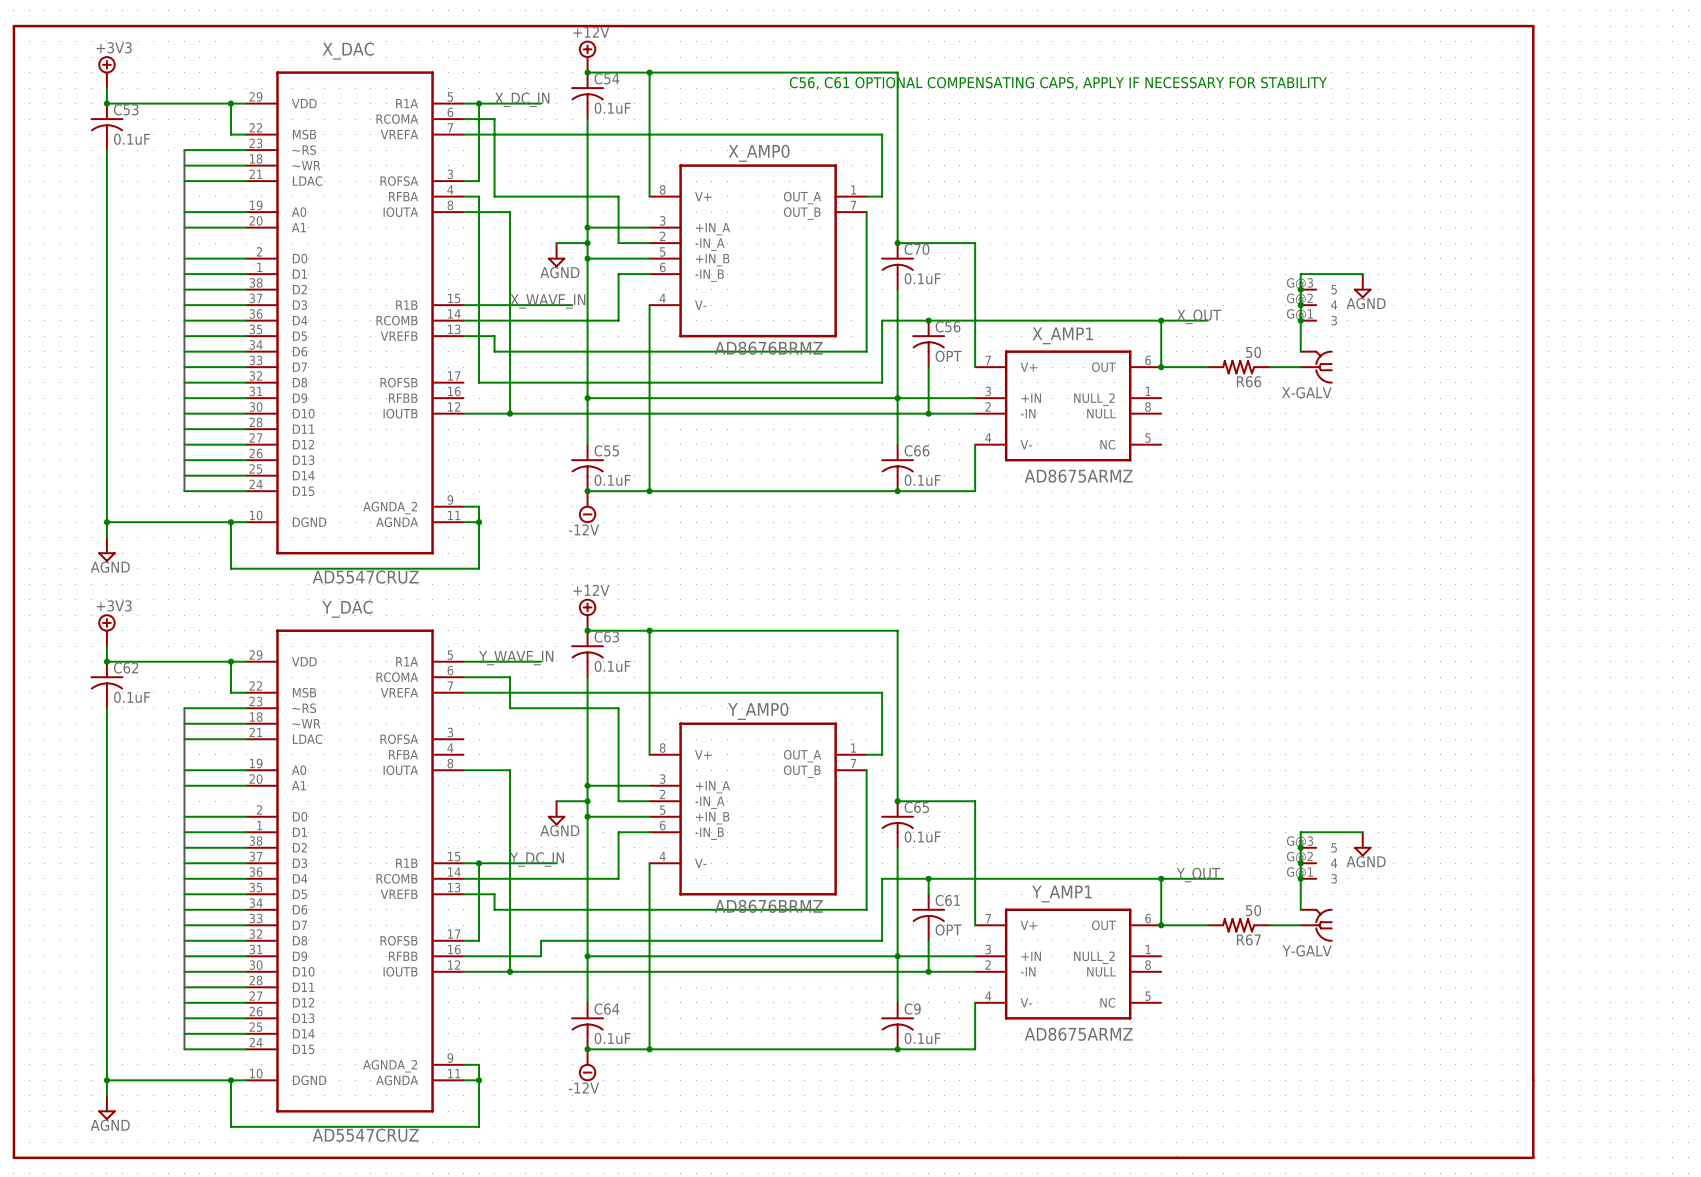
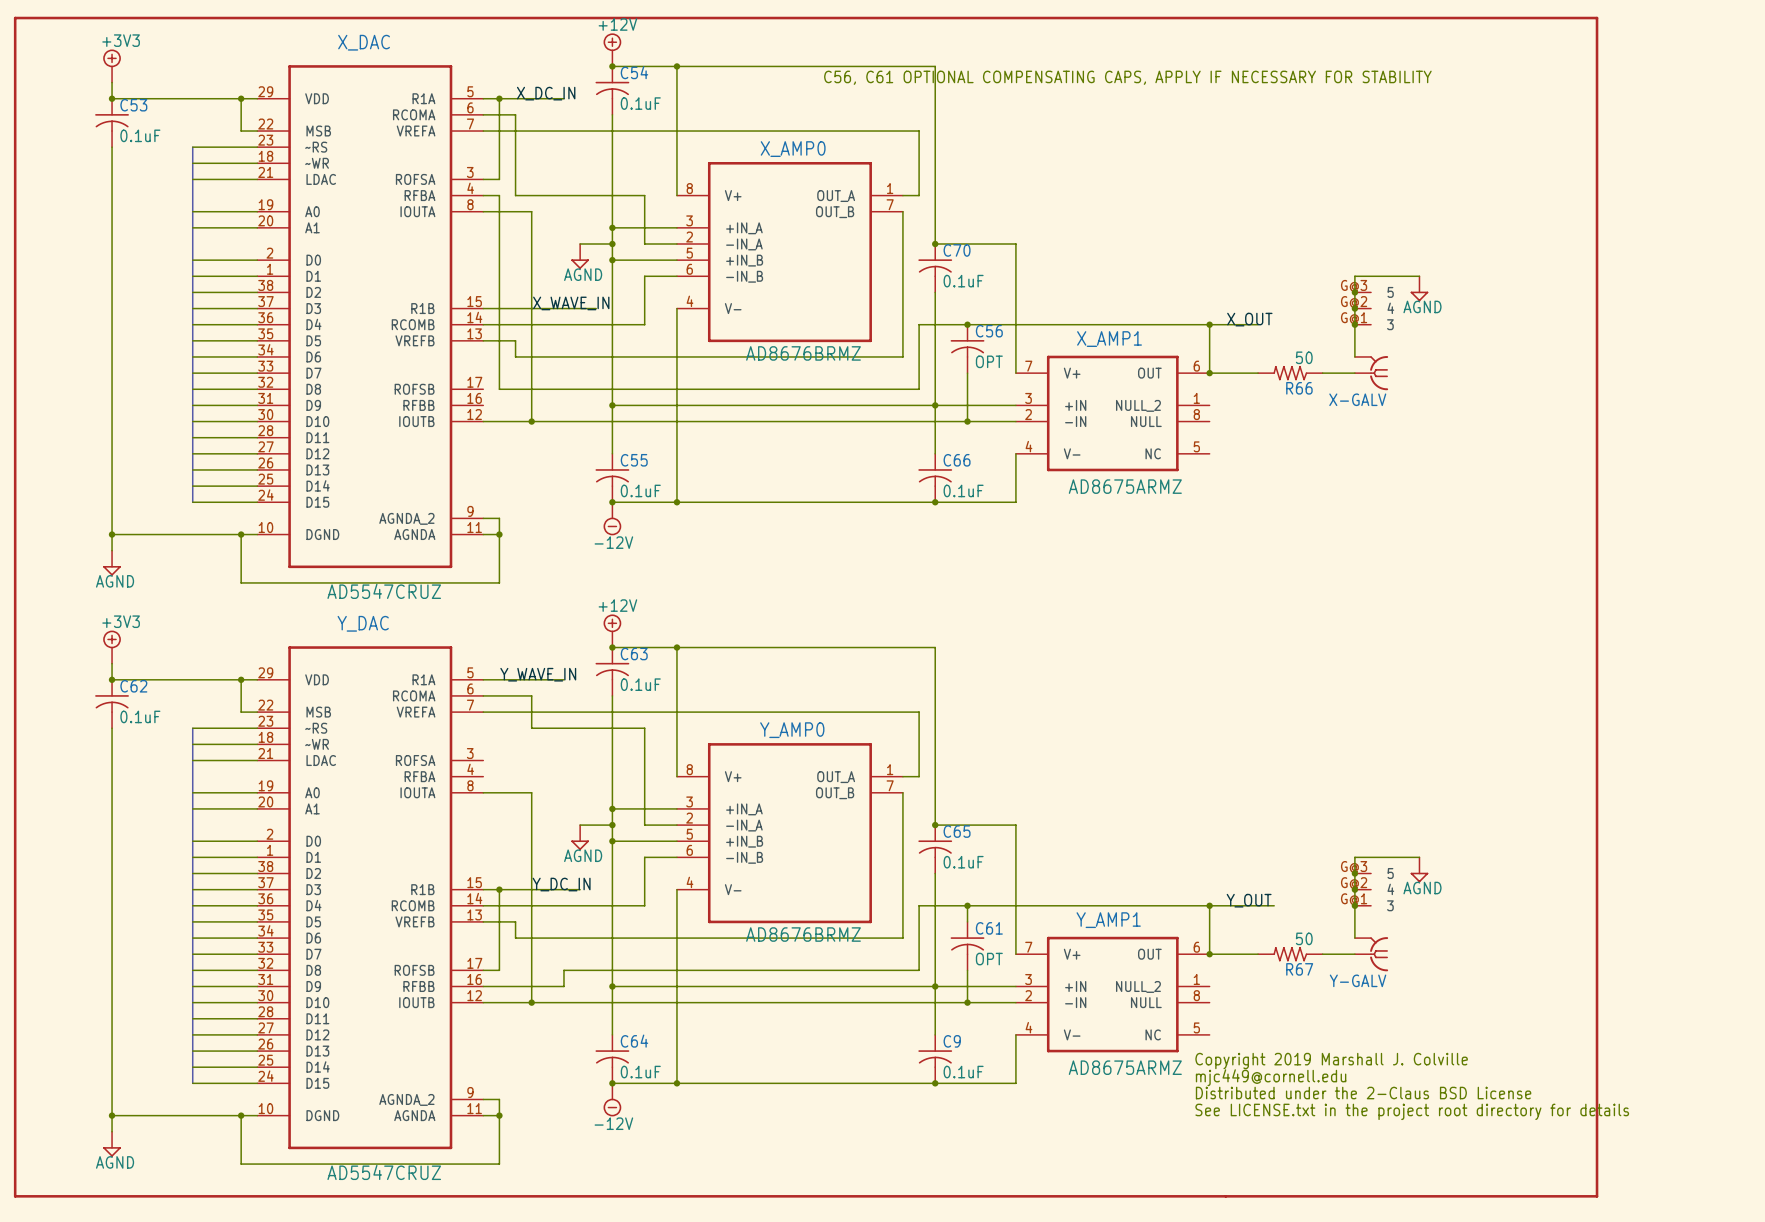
text: none -> Copyright 2019 Marshall J. Colville (1331, 1061)
text: none -> mjc449@cornell.edu (1271, 1077)
text: none -> Distributed under the 2-Claus BSD License (1363, 1093)
text: none -> See LICENSE.txt in the project root directory for details (1412, 1111)

